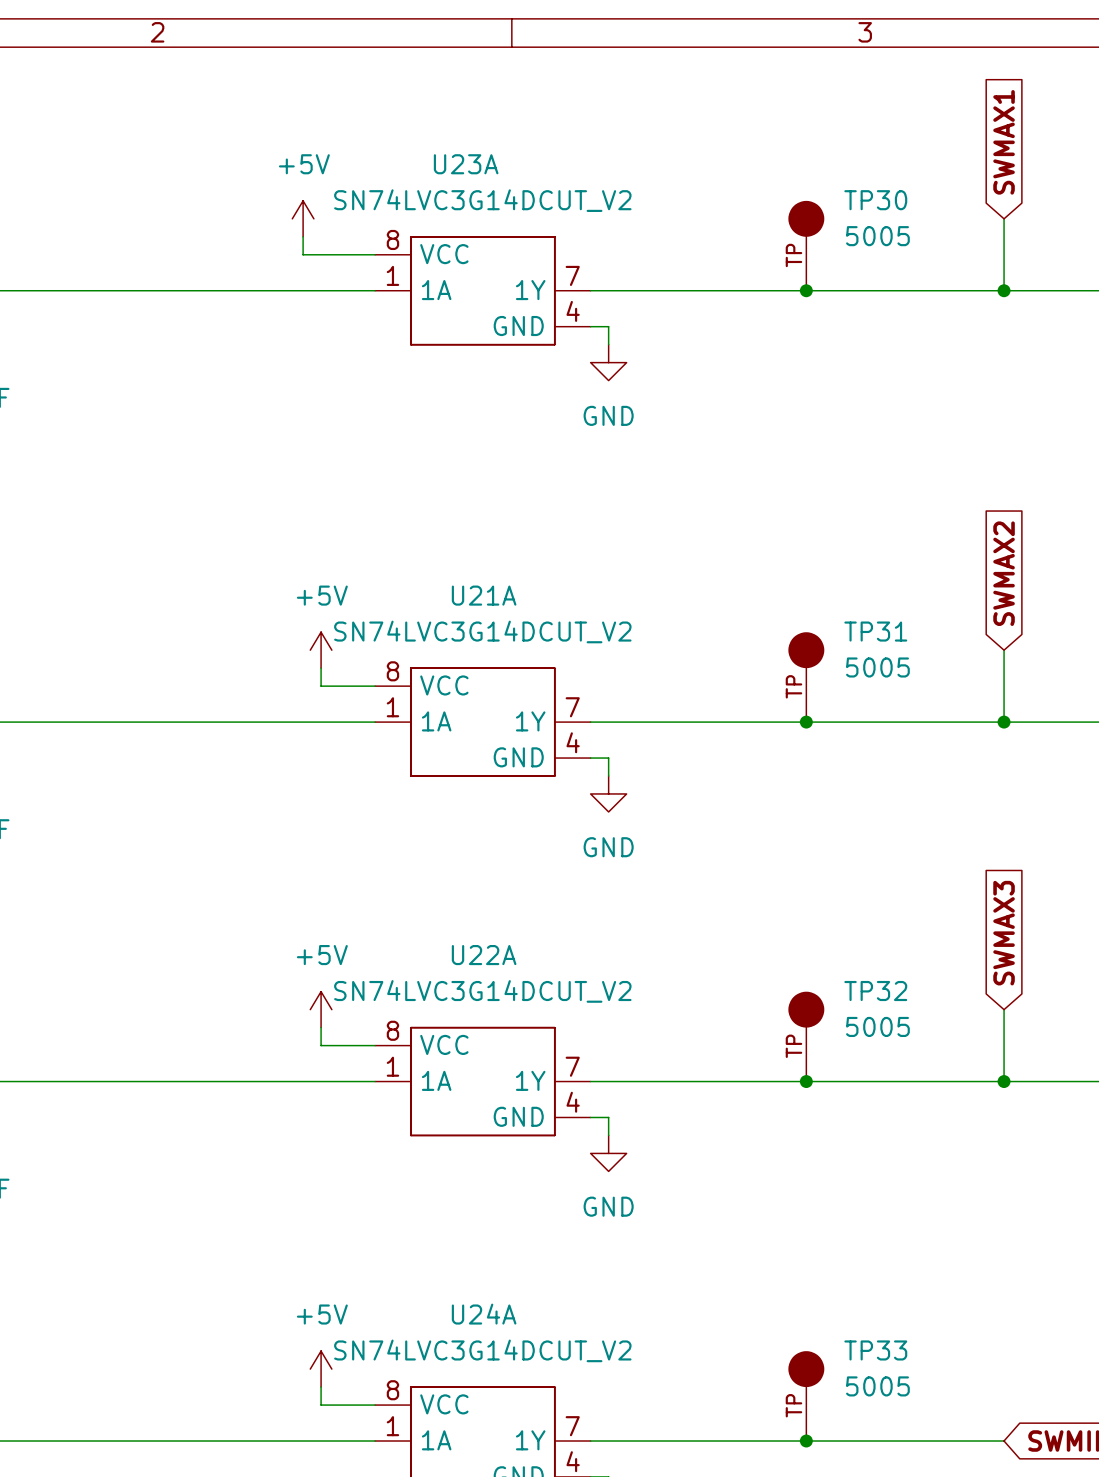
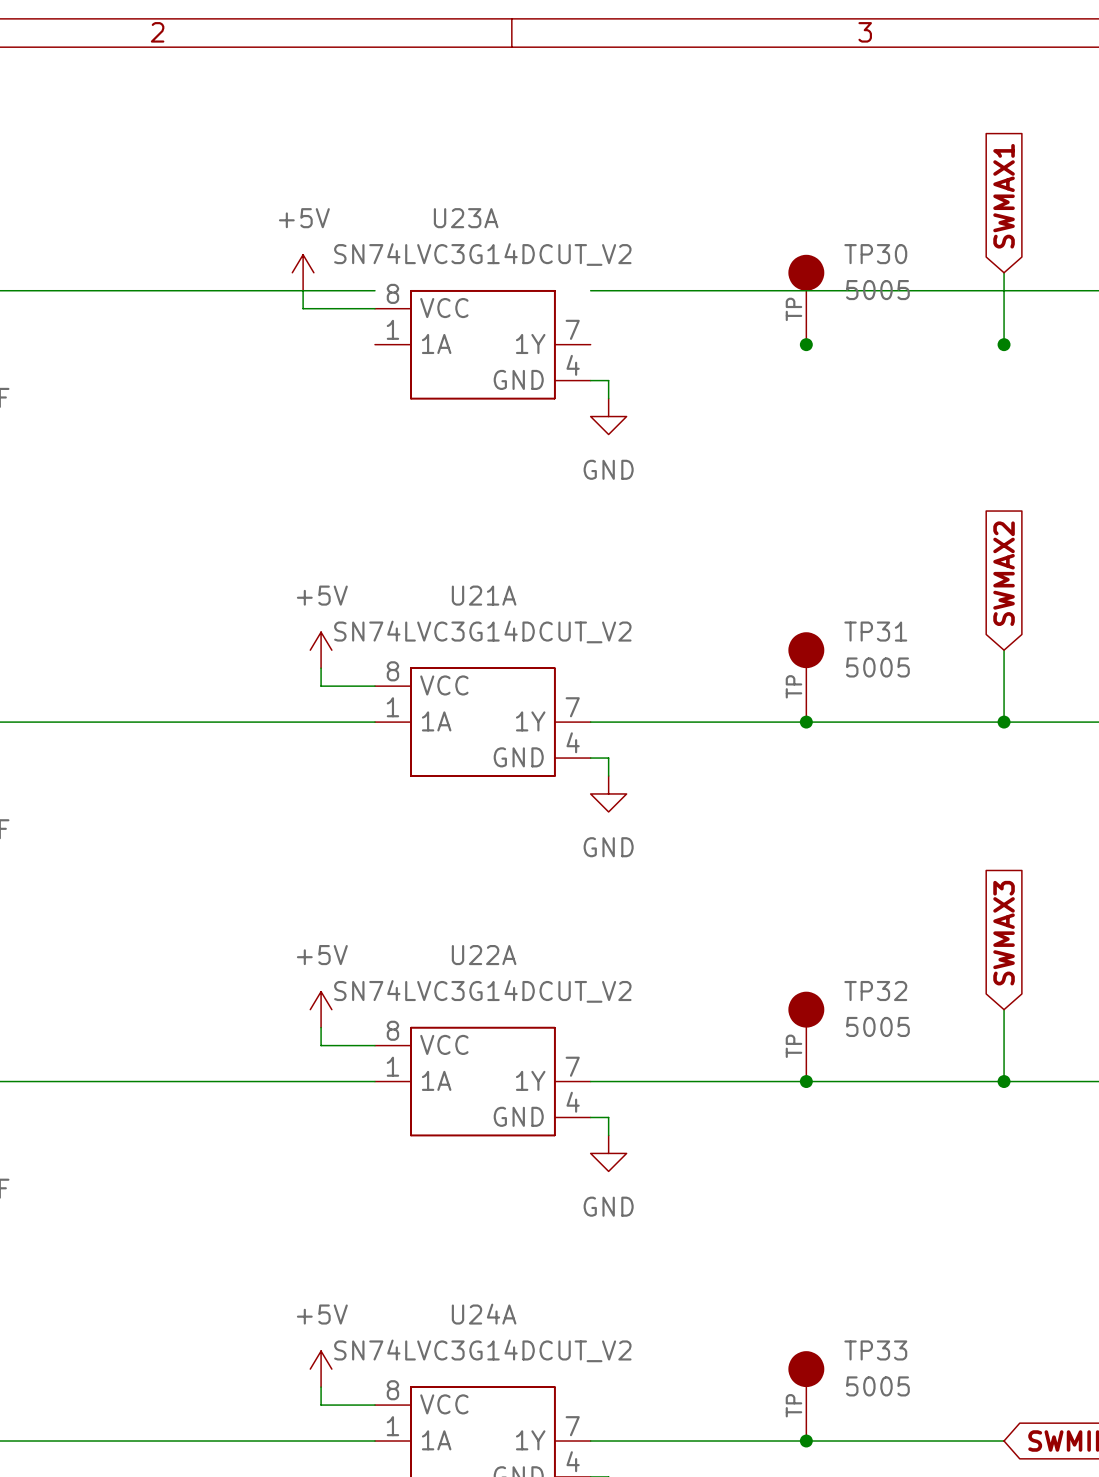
global label position: SWMAX1 (1004, 142) -> SWMAX1 (1004, 196)
power symbol position: +5V (303, 218) -> +5V (303, 272)
wire: (1004, 218) (1004, 272) -> (1004, 290) (1004, 344)
wire: (303, 236) (303, 254) (374, 254) -> (303, 290) (303, 308) (374, 308)
TP30 position: (806, 245) -> (806, 299)
U23A position: (482, 290) -> (482, 344)
junction position: (806, 290) -> (806, 344)
junction position: (1004, 290) -> (1004, 344)
wire: (590, 326) (608, 326) (608, 344) -> (590, 380) (608, 380) (608, 398)
power symbol position: GND (608, 362) -> GND (608, 416)

